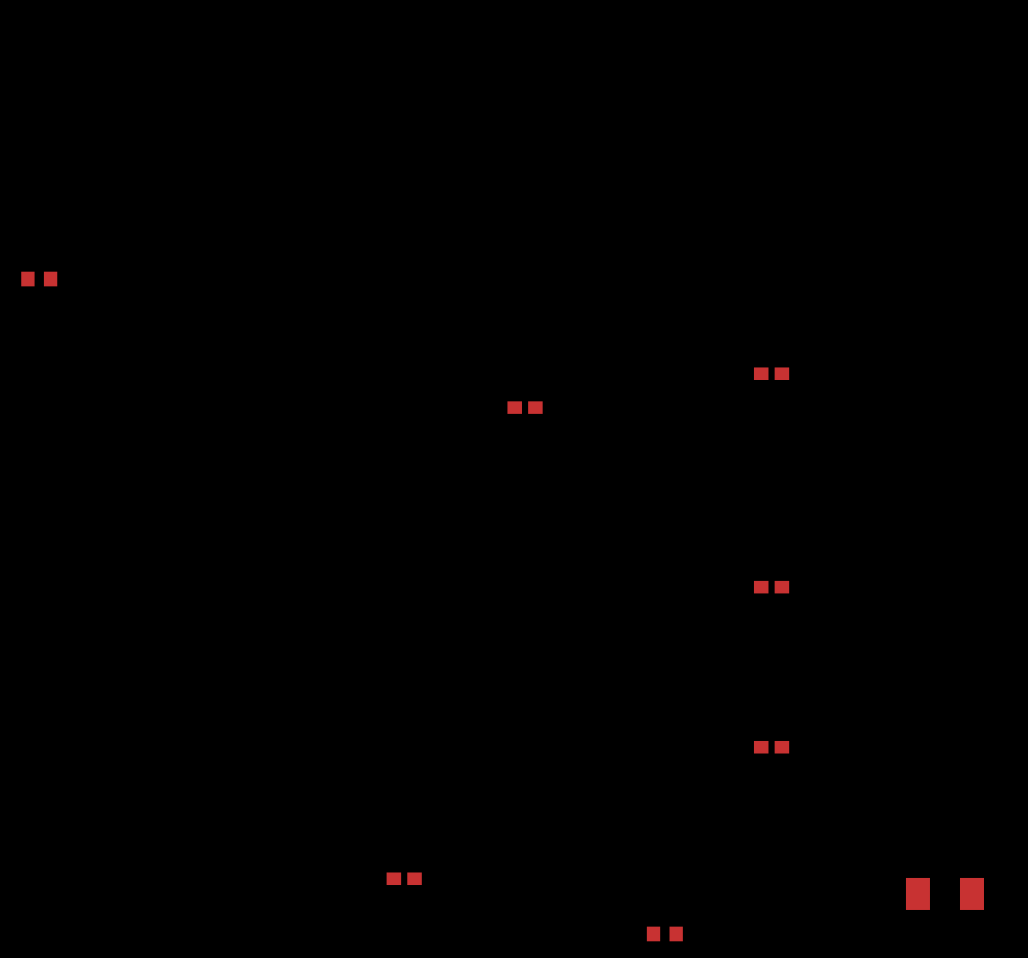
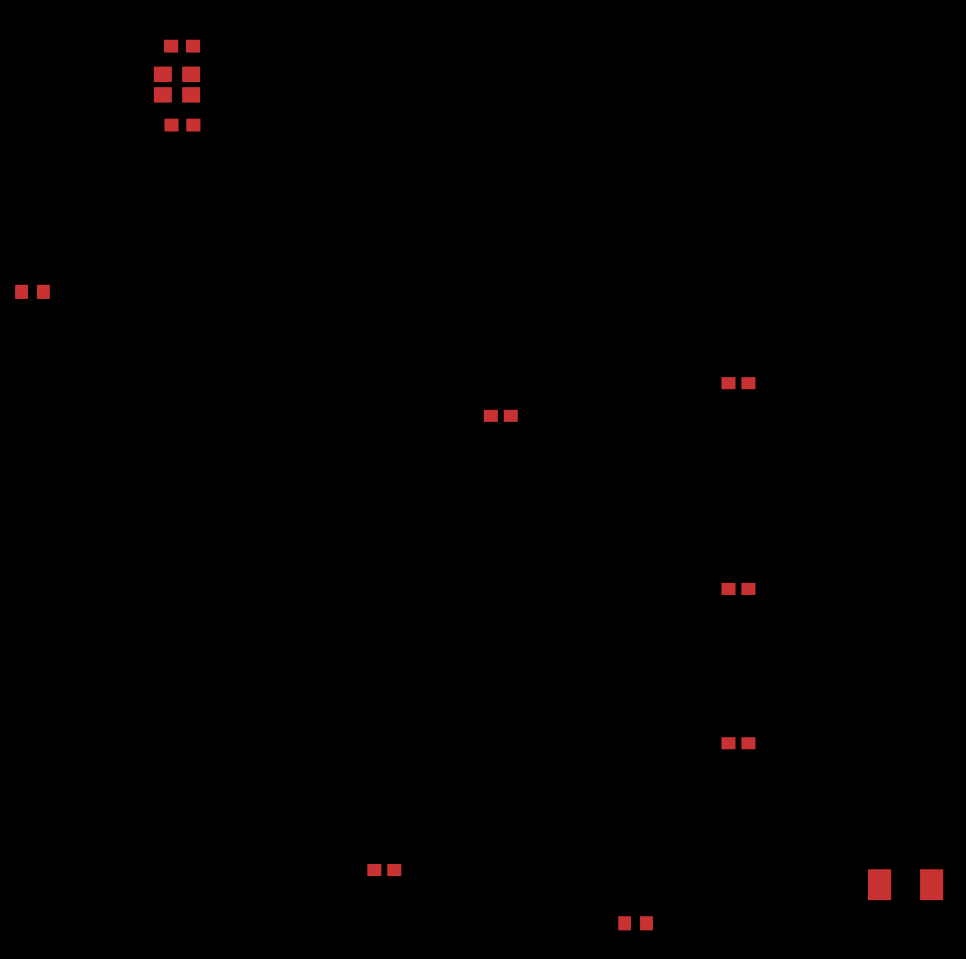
part: none -> (182, 46)
part: none -> (176, 84)
part: none -> (182, 125)

